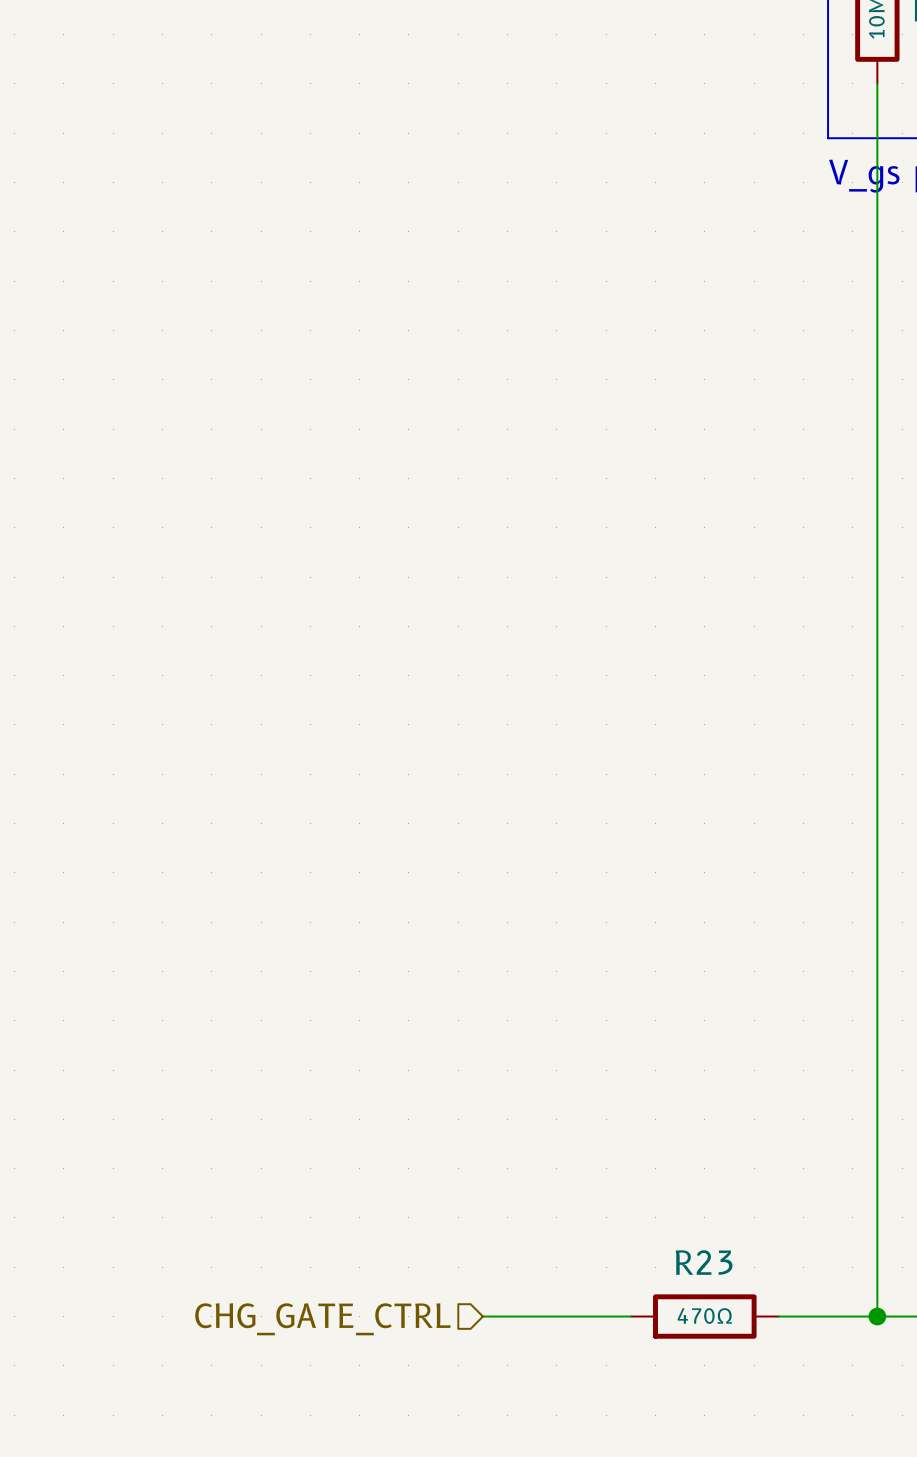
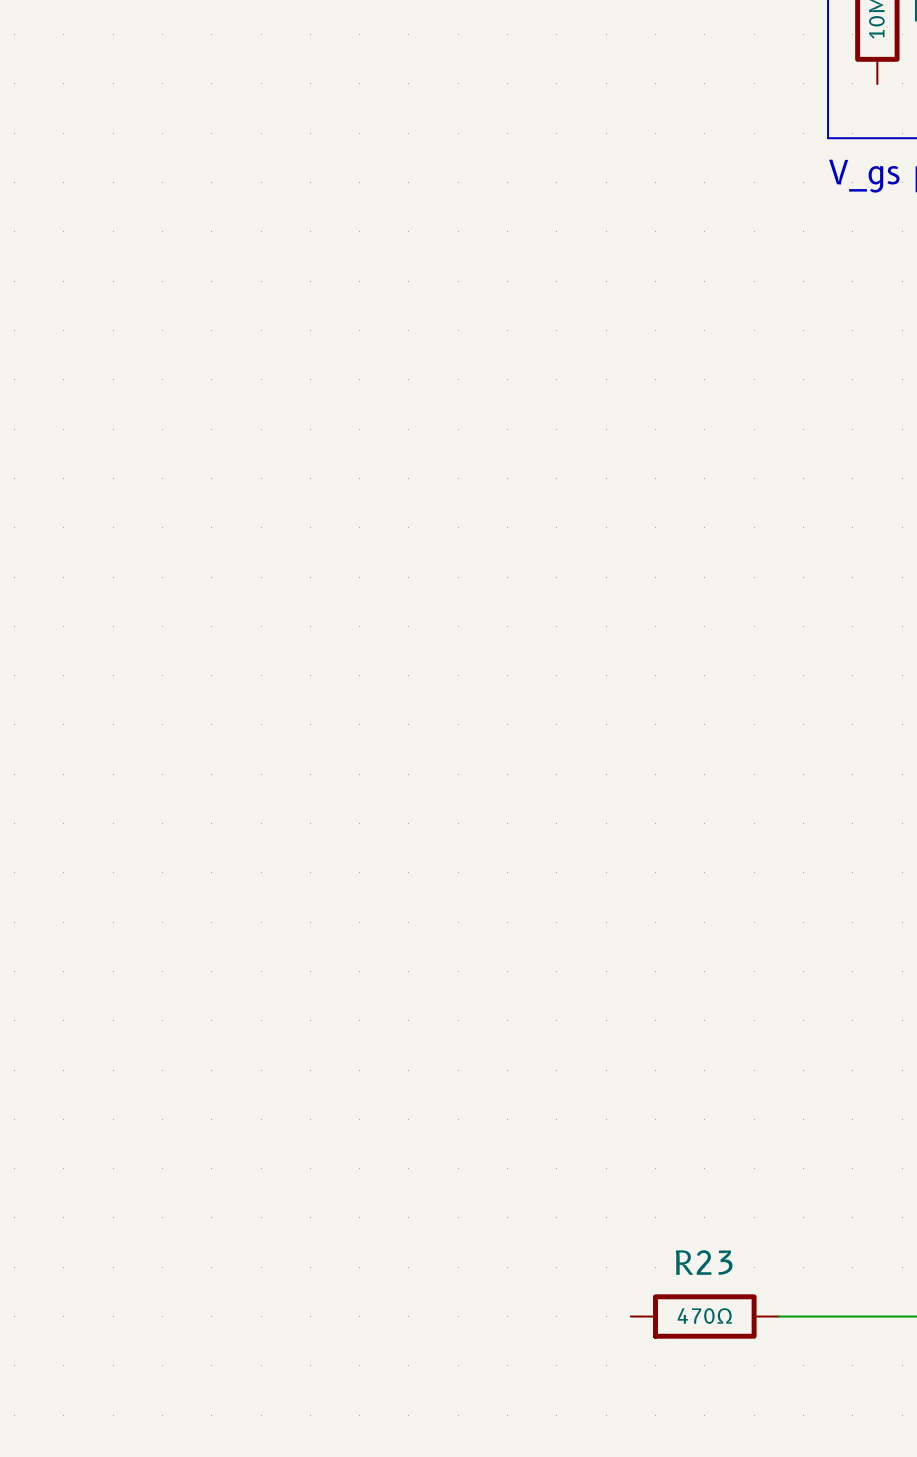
wire: (877, 83) (877, 1316) -> none
wire: (482, 1316) (630, 1316) -> none
junction: (877, 1316) -> none
hierarchical label: CHG_GATE_CTRL (322, 1319) -> none

